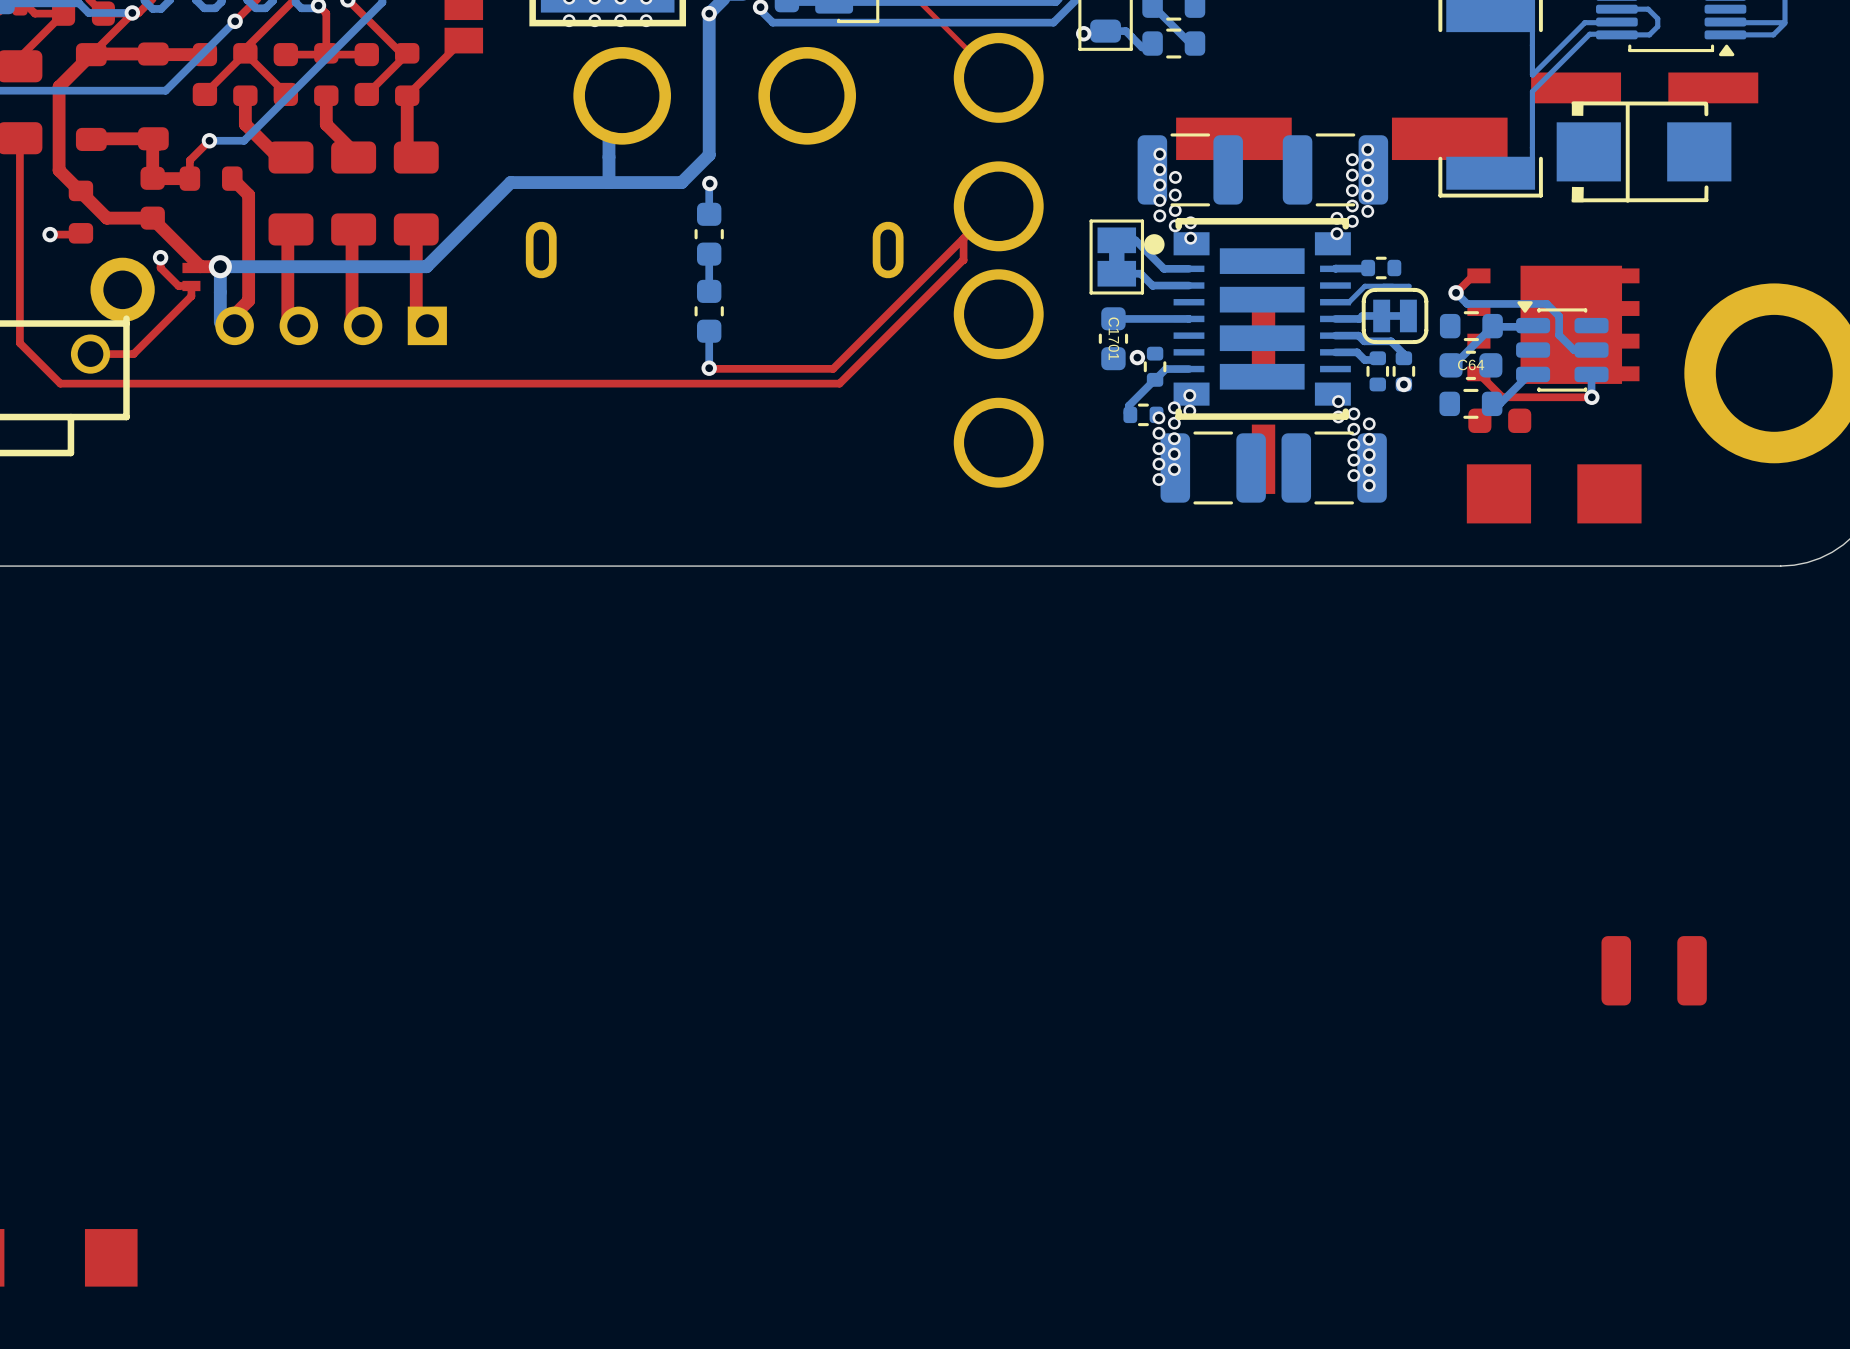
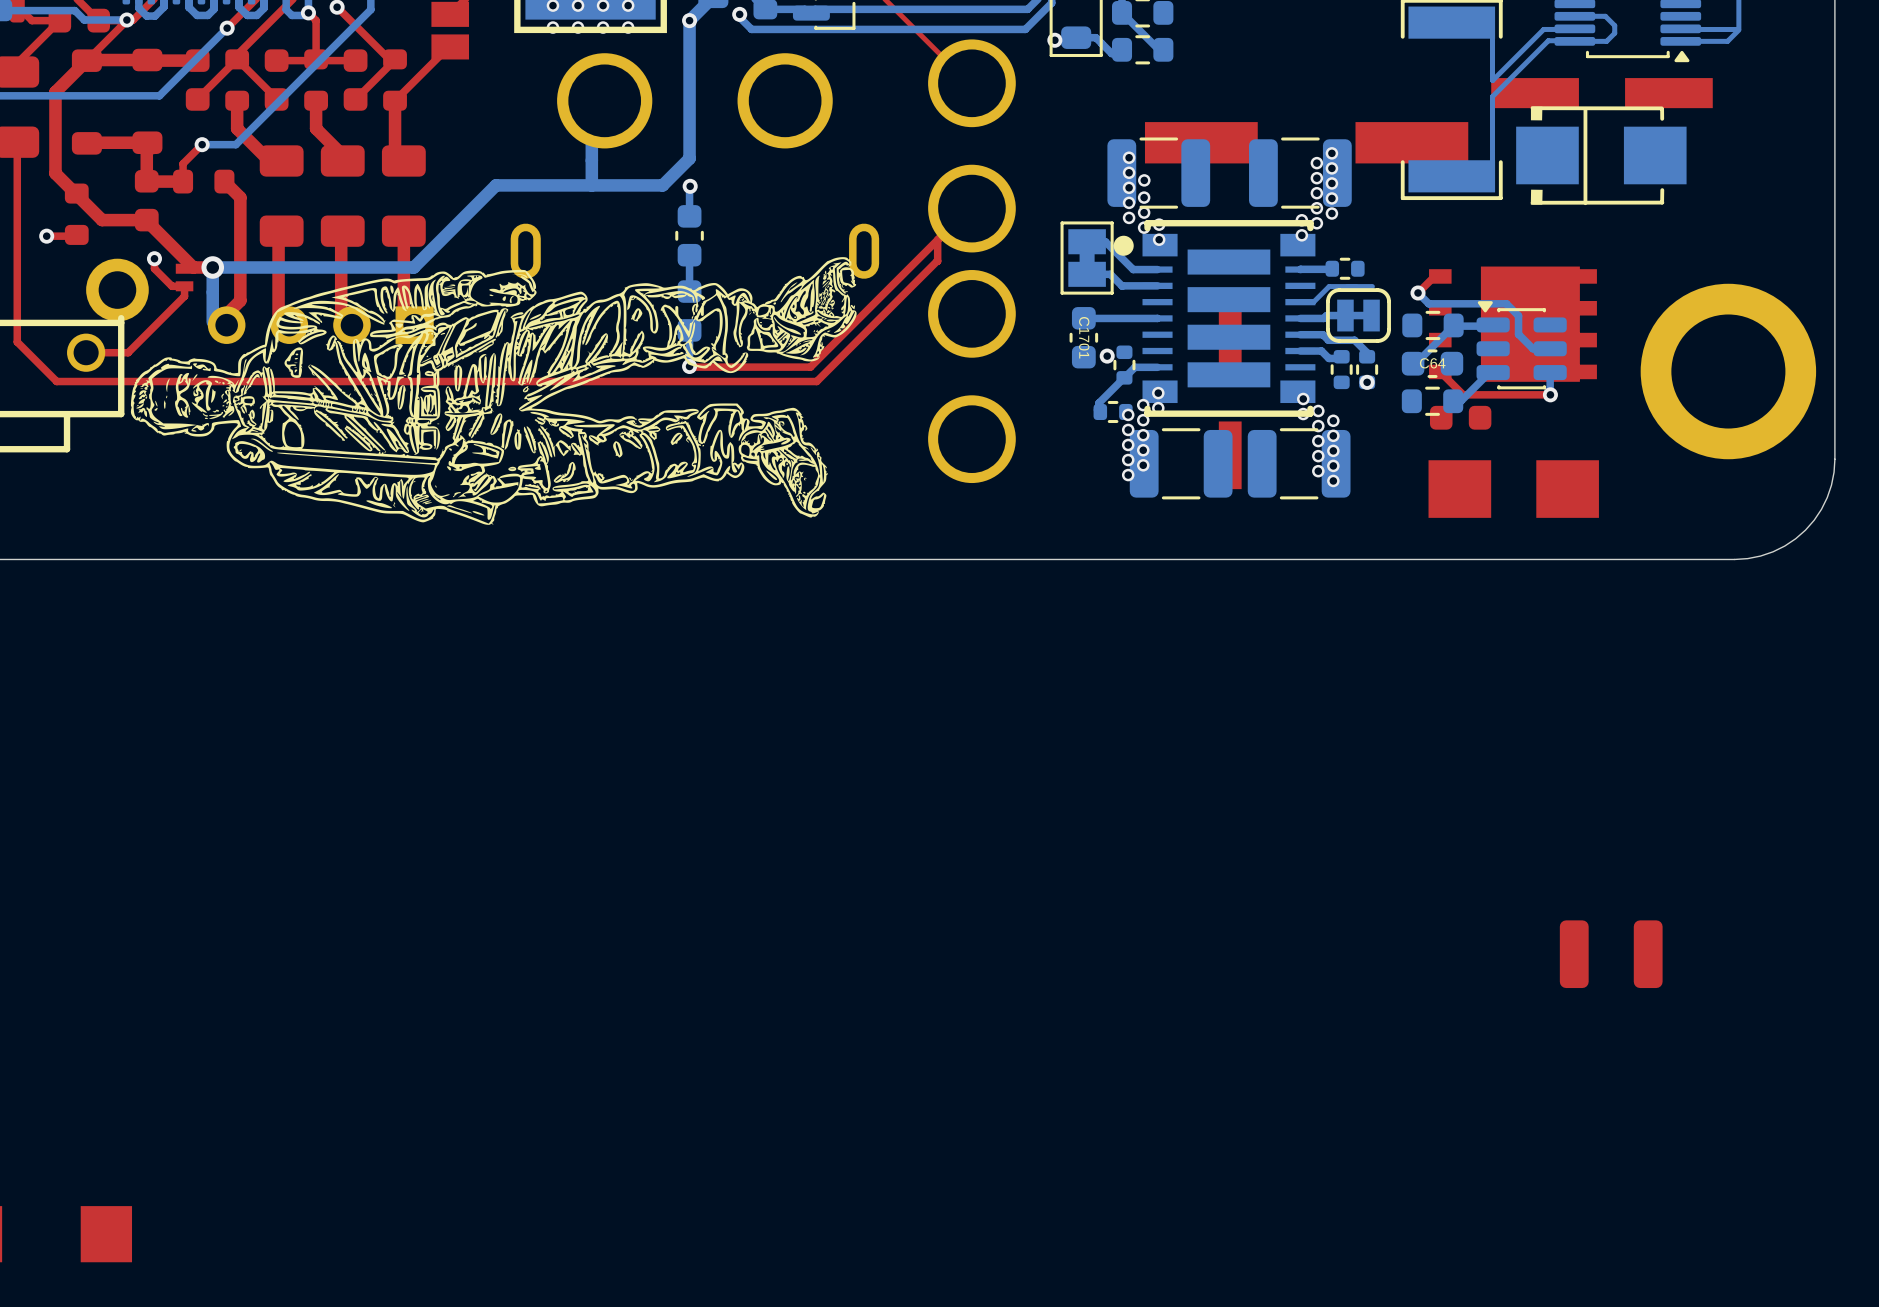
drawing: none -> [130, 257, 857, 526]

